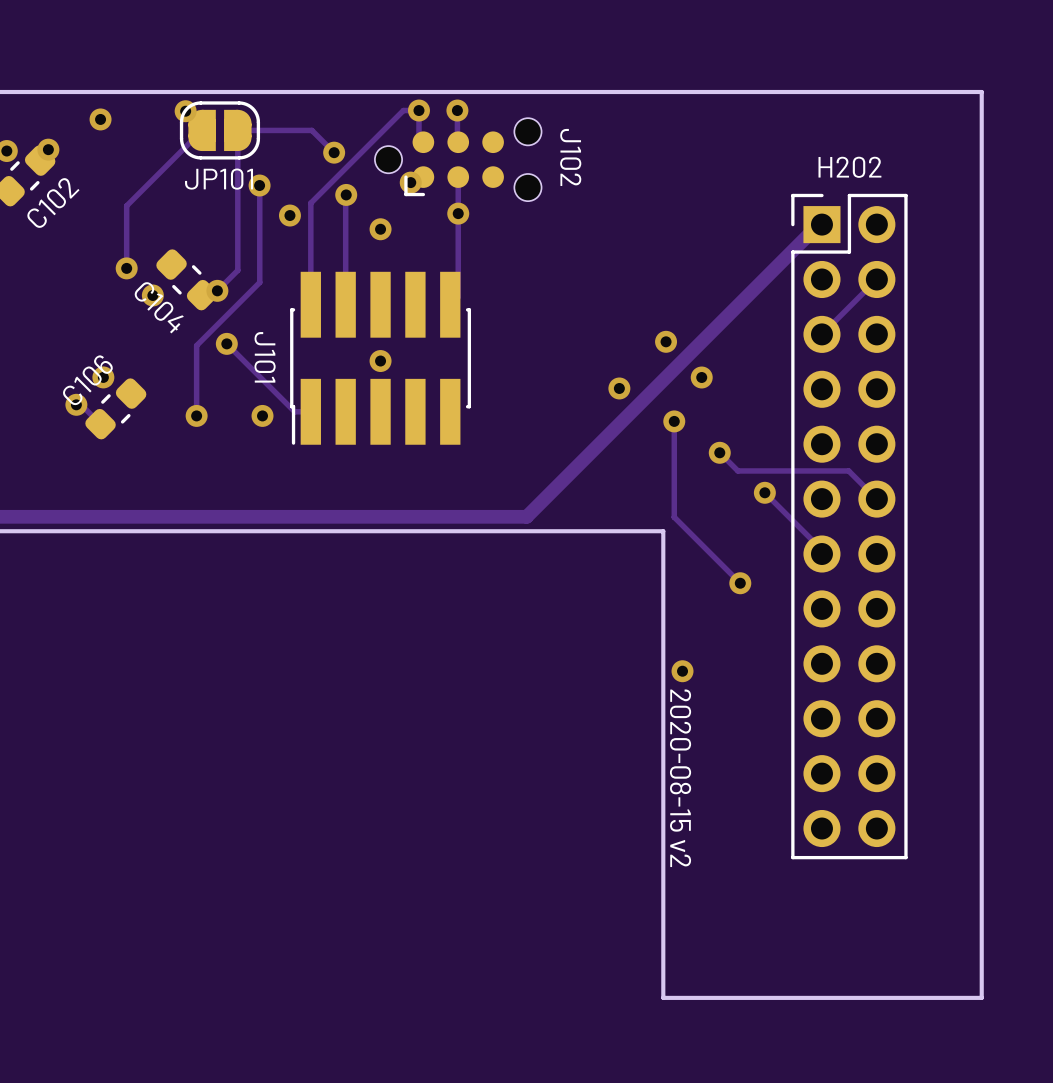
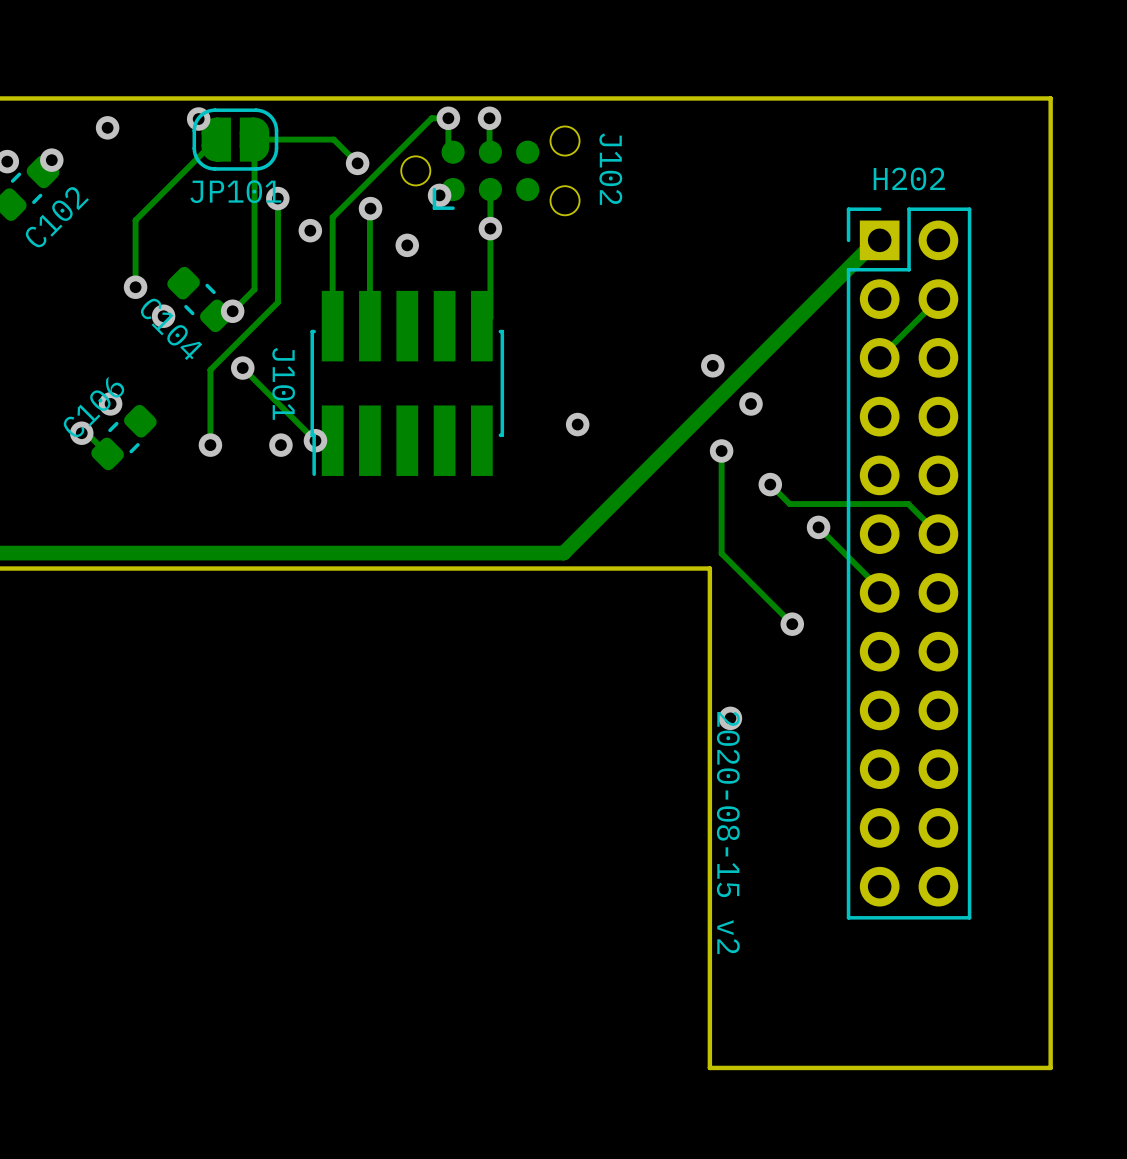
via: (380, 361) -> none
via position: (619, 388) -> (577, 424)
via: none -> (315, 440)

